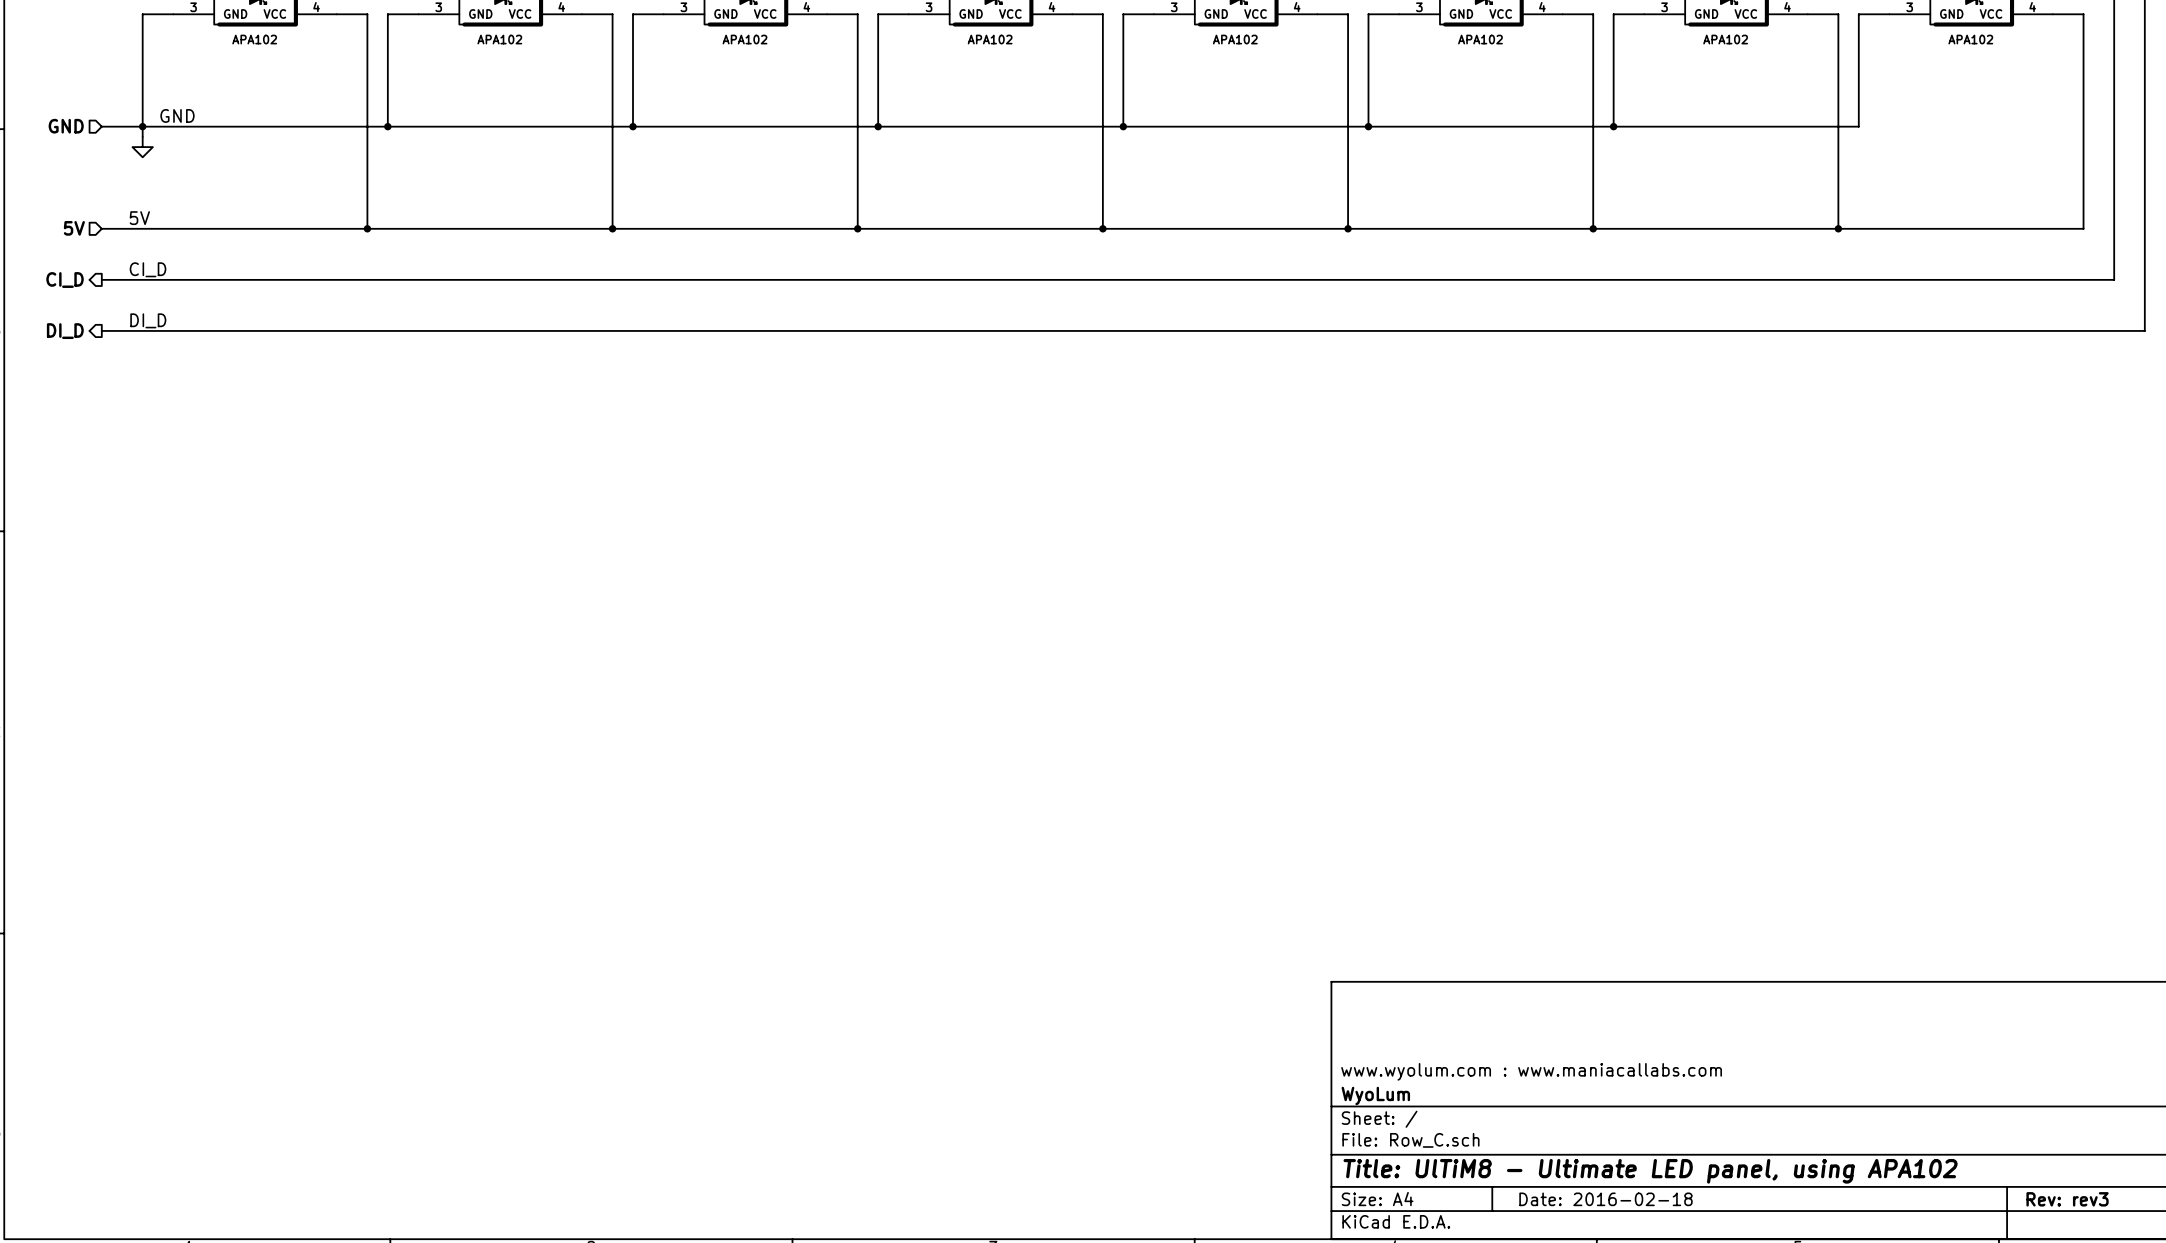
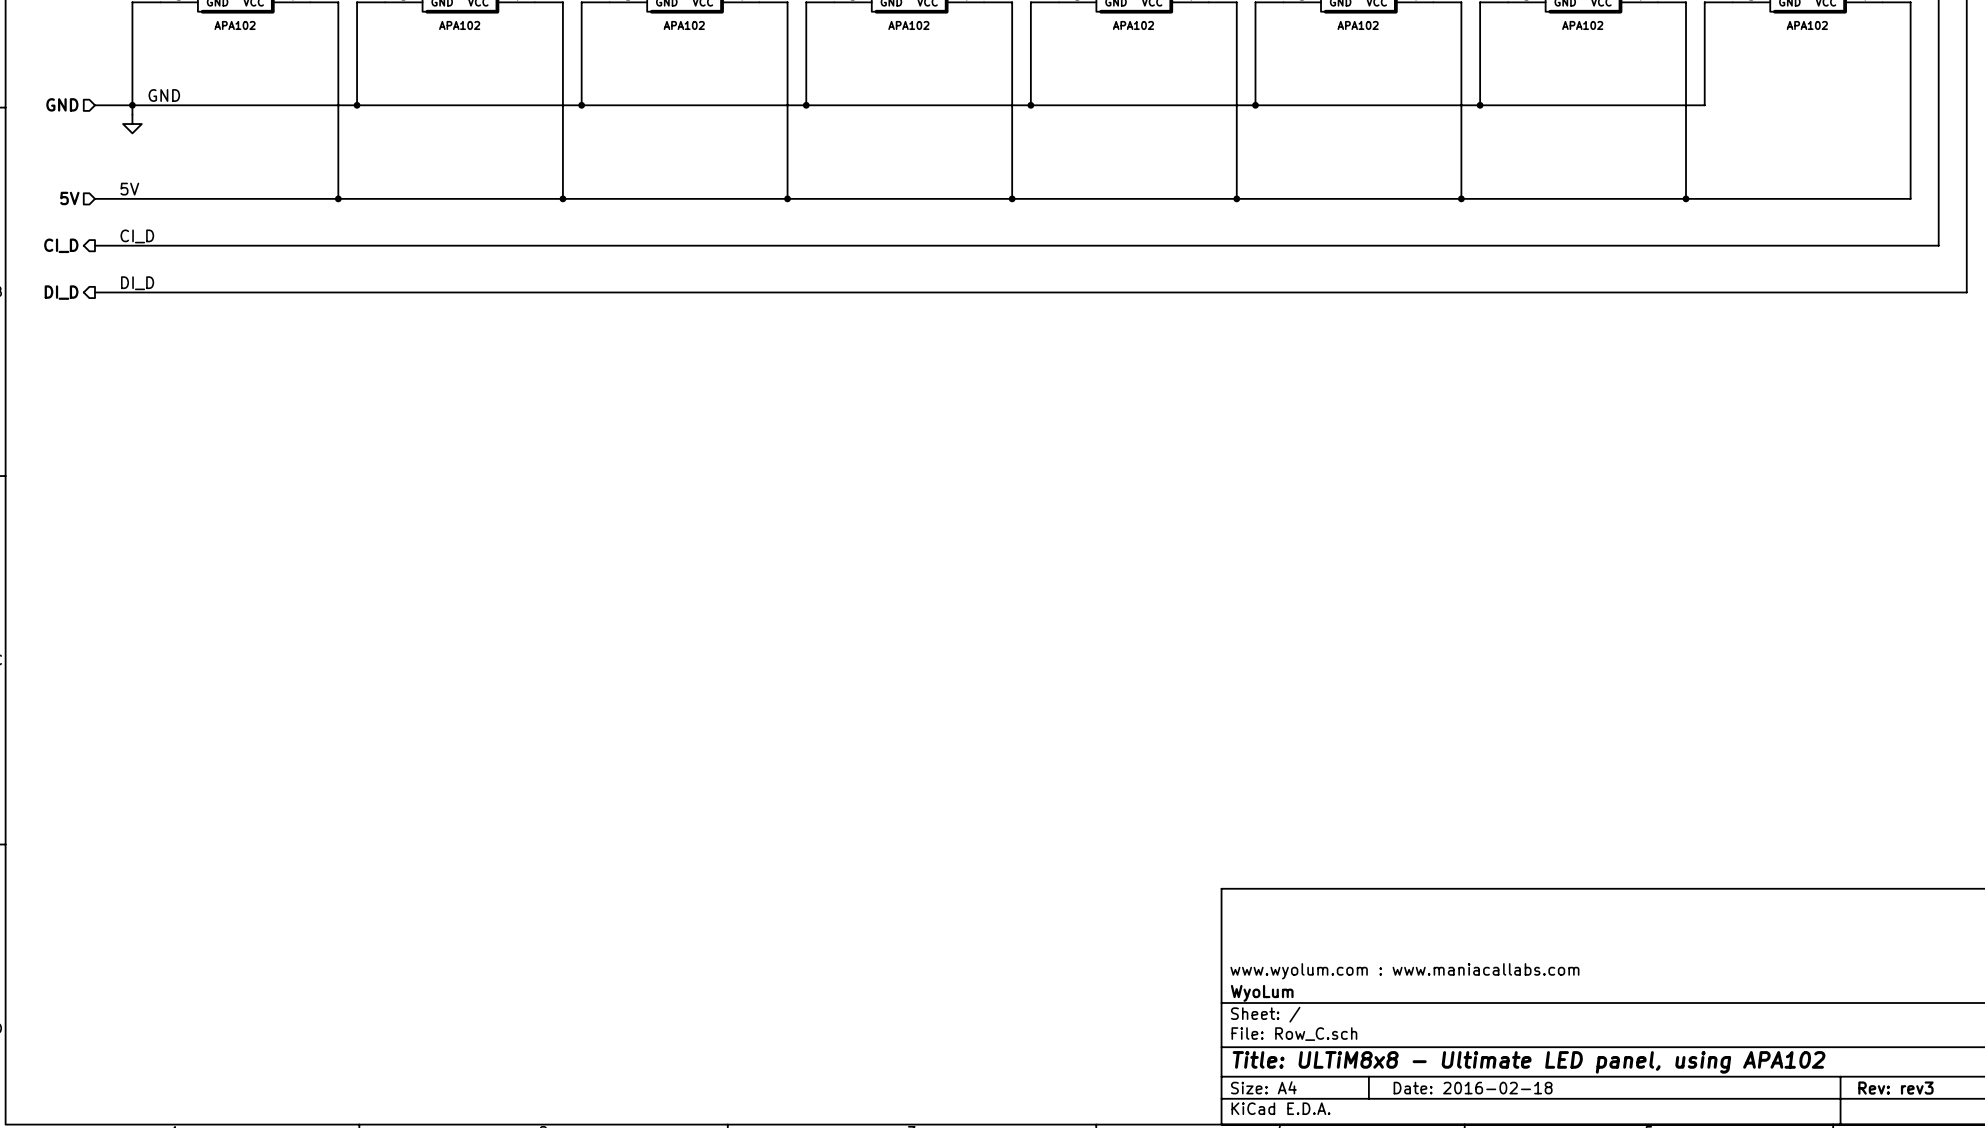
title block: Title: UlTiM8 - Ultimate LED panel, using APA102 (1650, 1171) -> Title: ULTiM8x8 - Ultimate LED panel, using APA102 (1529, 1062)

